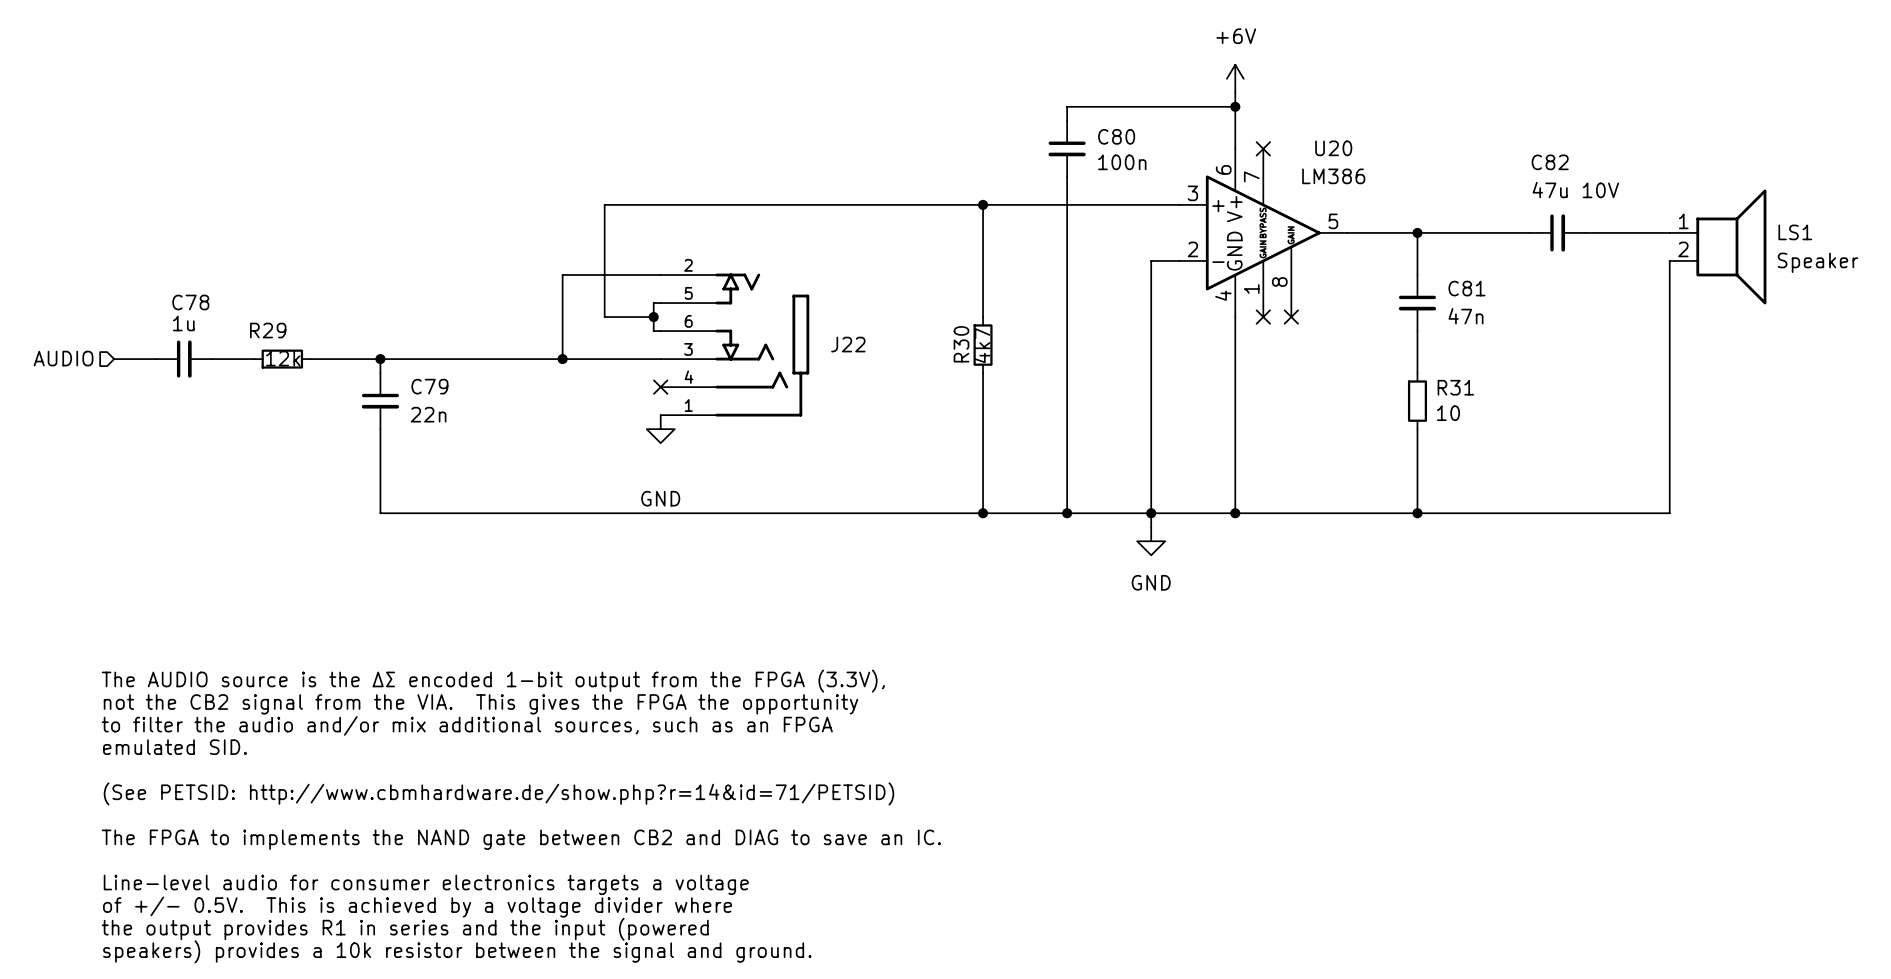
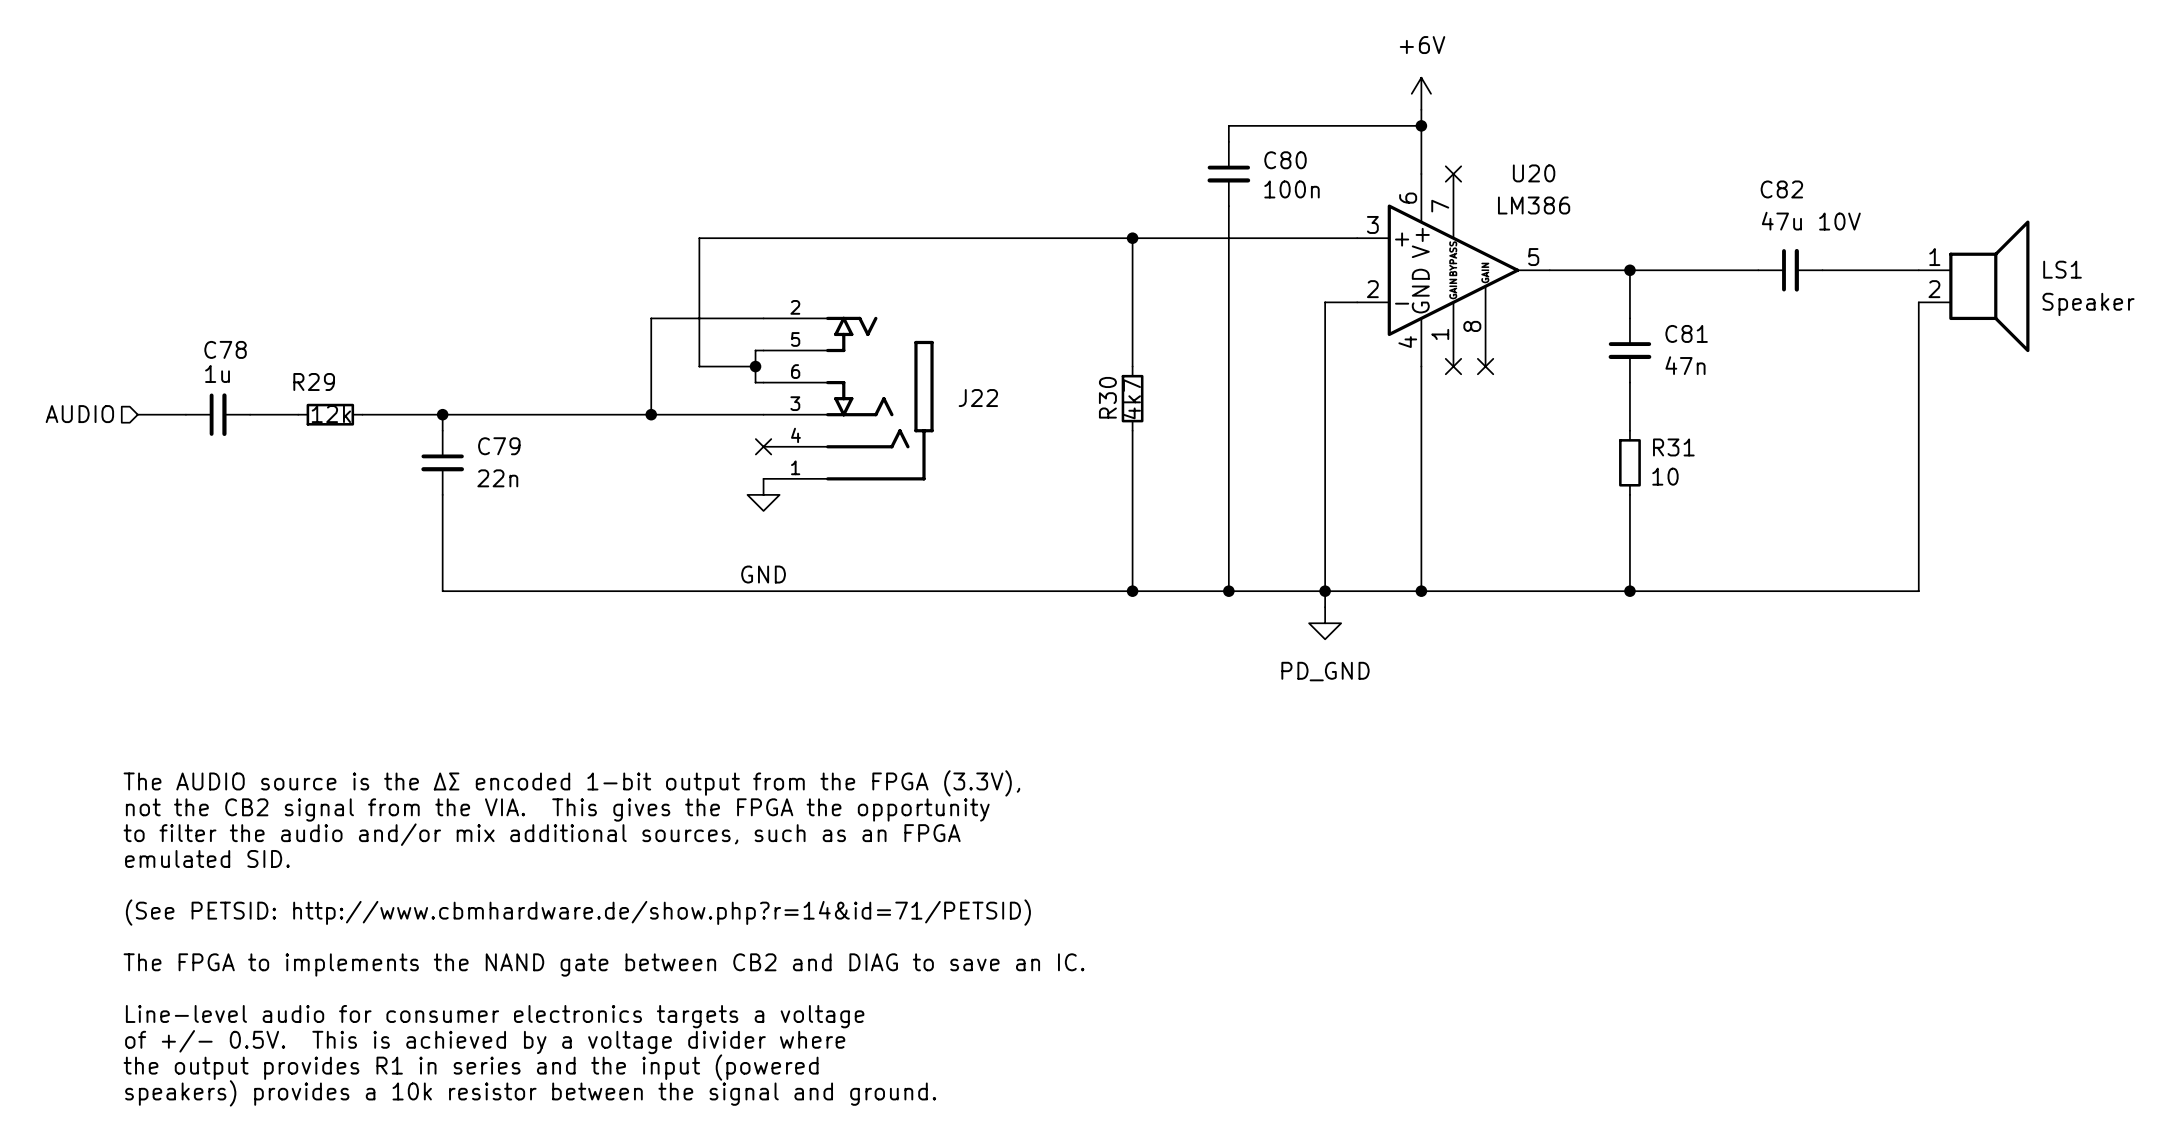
power symbol: GND (1151, 541) -> PD_GND (1325, 623)

